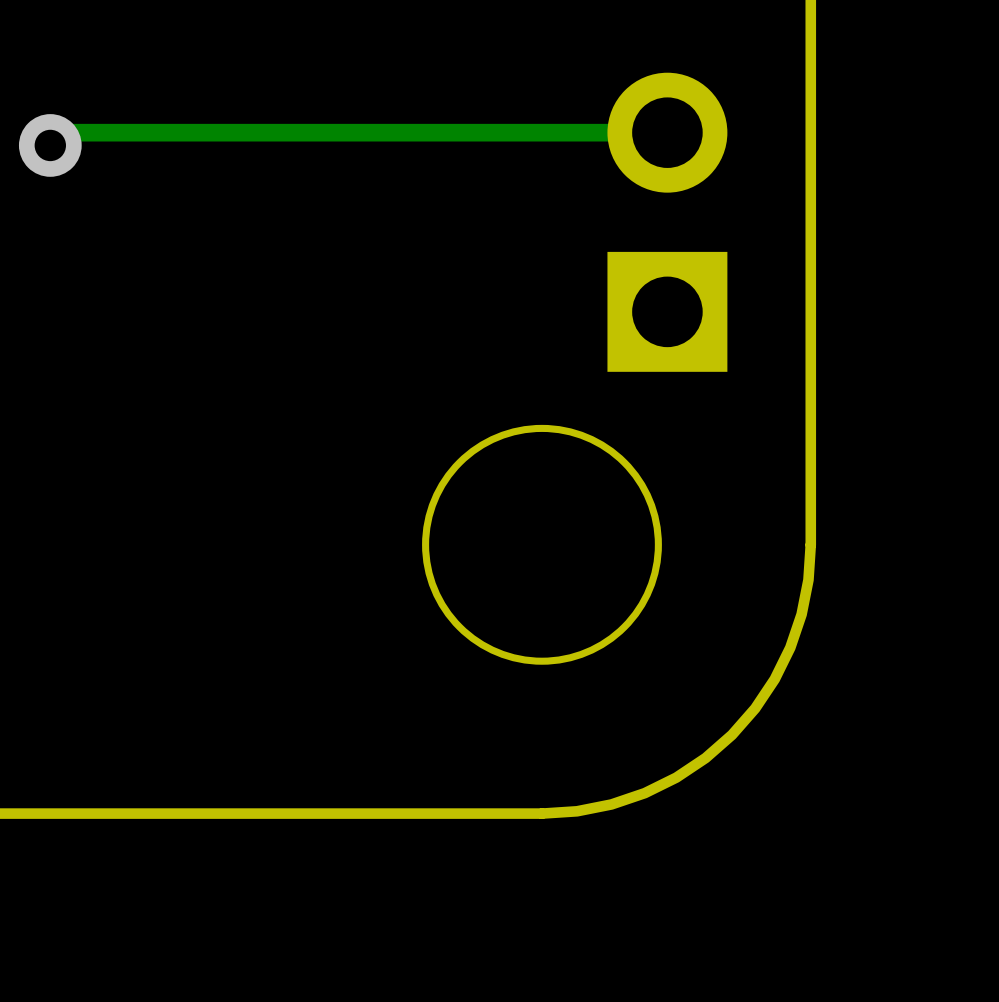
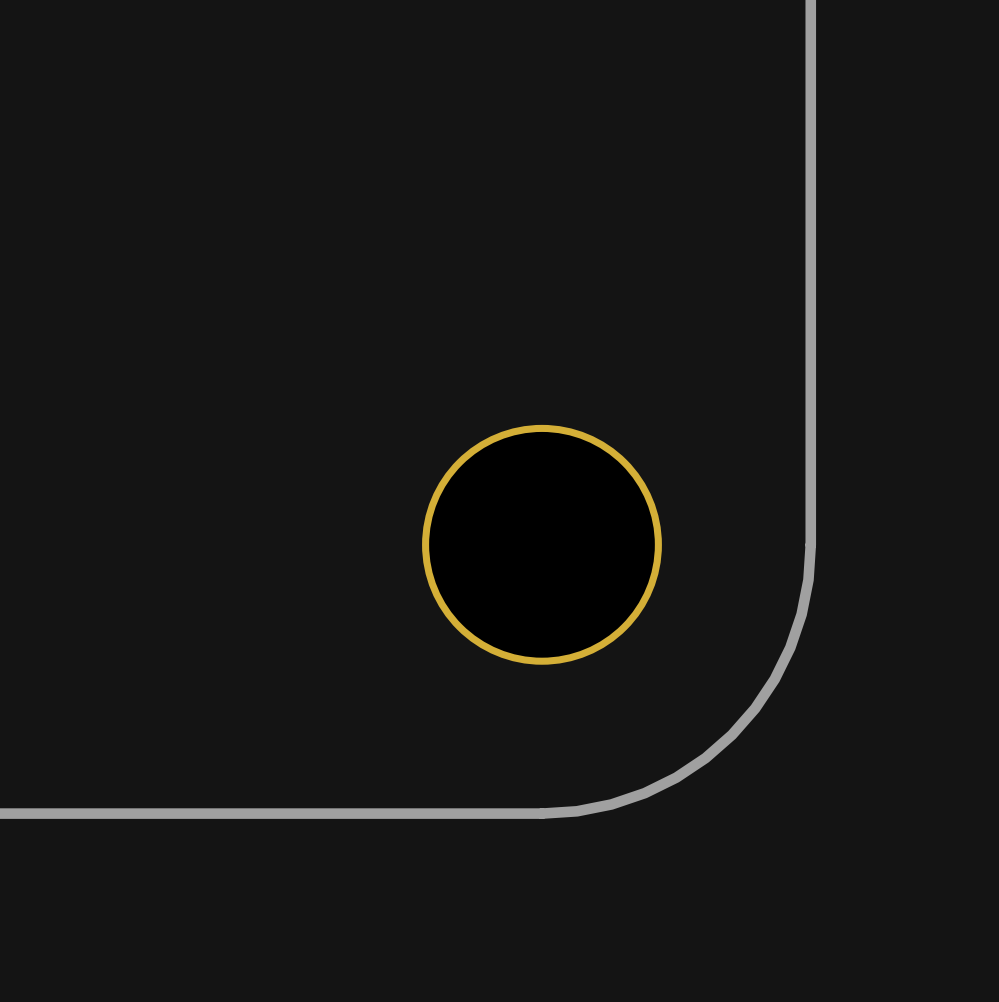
track: (667, 132) (63, 132) (50, 145) -> none
via: (50, 145) -> none
part: (667, 222) -> none

